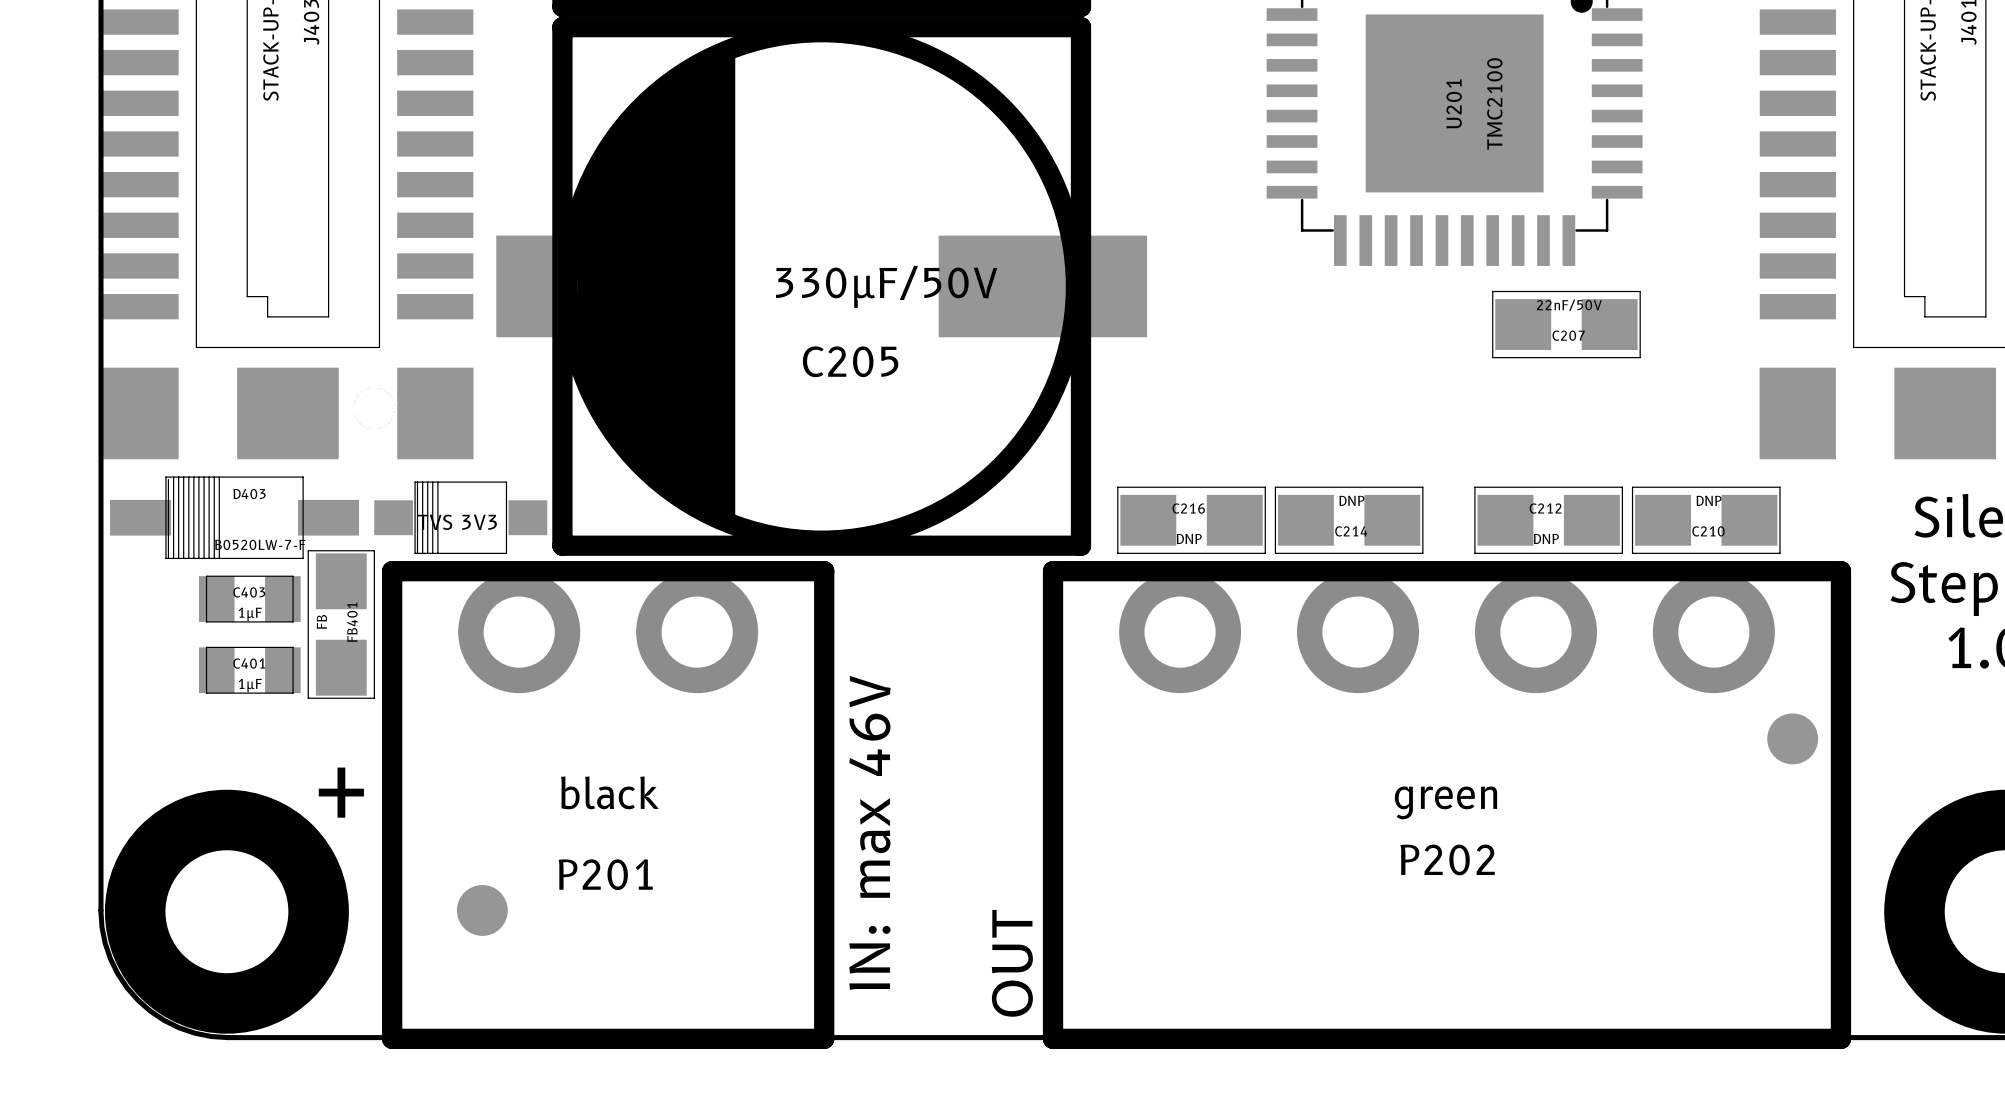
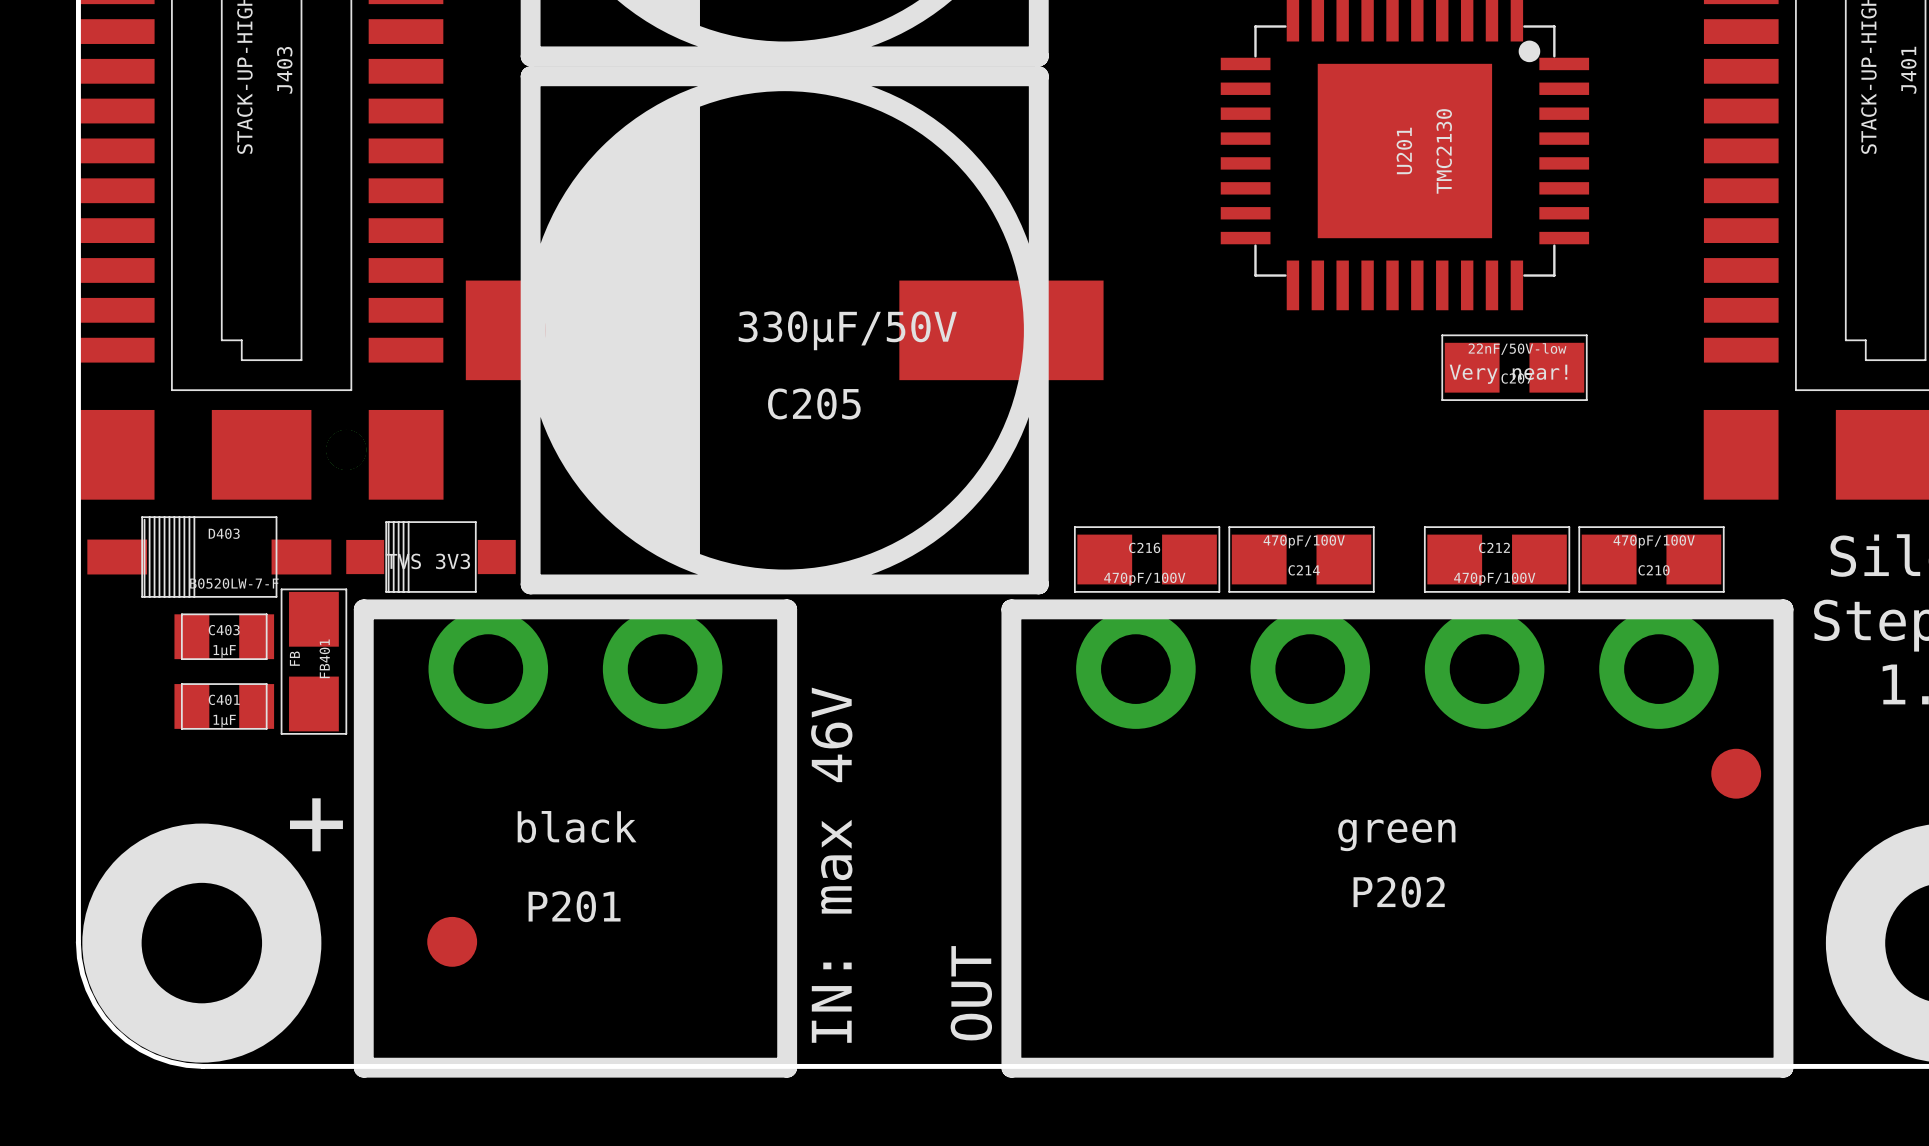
U201 value: TMC2100 (1494, 103) -> TMC2130 (1444, 151)
C207 value: 22nF/50V (1569, 305) -> 22nF/50V-low (1517, 349)
text: none -> Very near! (1508, 374)
C214 value: DNP (1351, 500) -> 470pF/100V (1304, 541)
C210 value: DNP (1709, 500) -> 470pF/100V (1654, 541)
C216 value: DNP (1189, 538) -> 470pF/100V (1144, 579)
C212 value: DNP (1546, 538) -> 470pF/100V (1494, 579)

